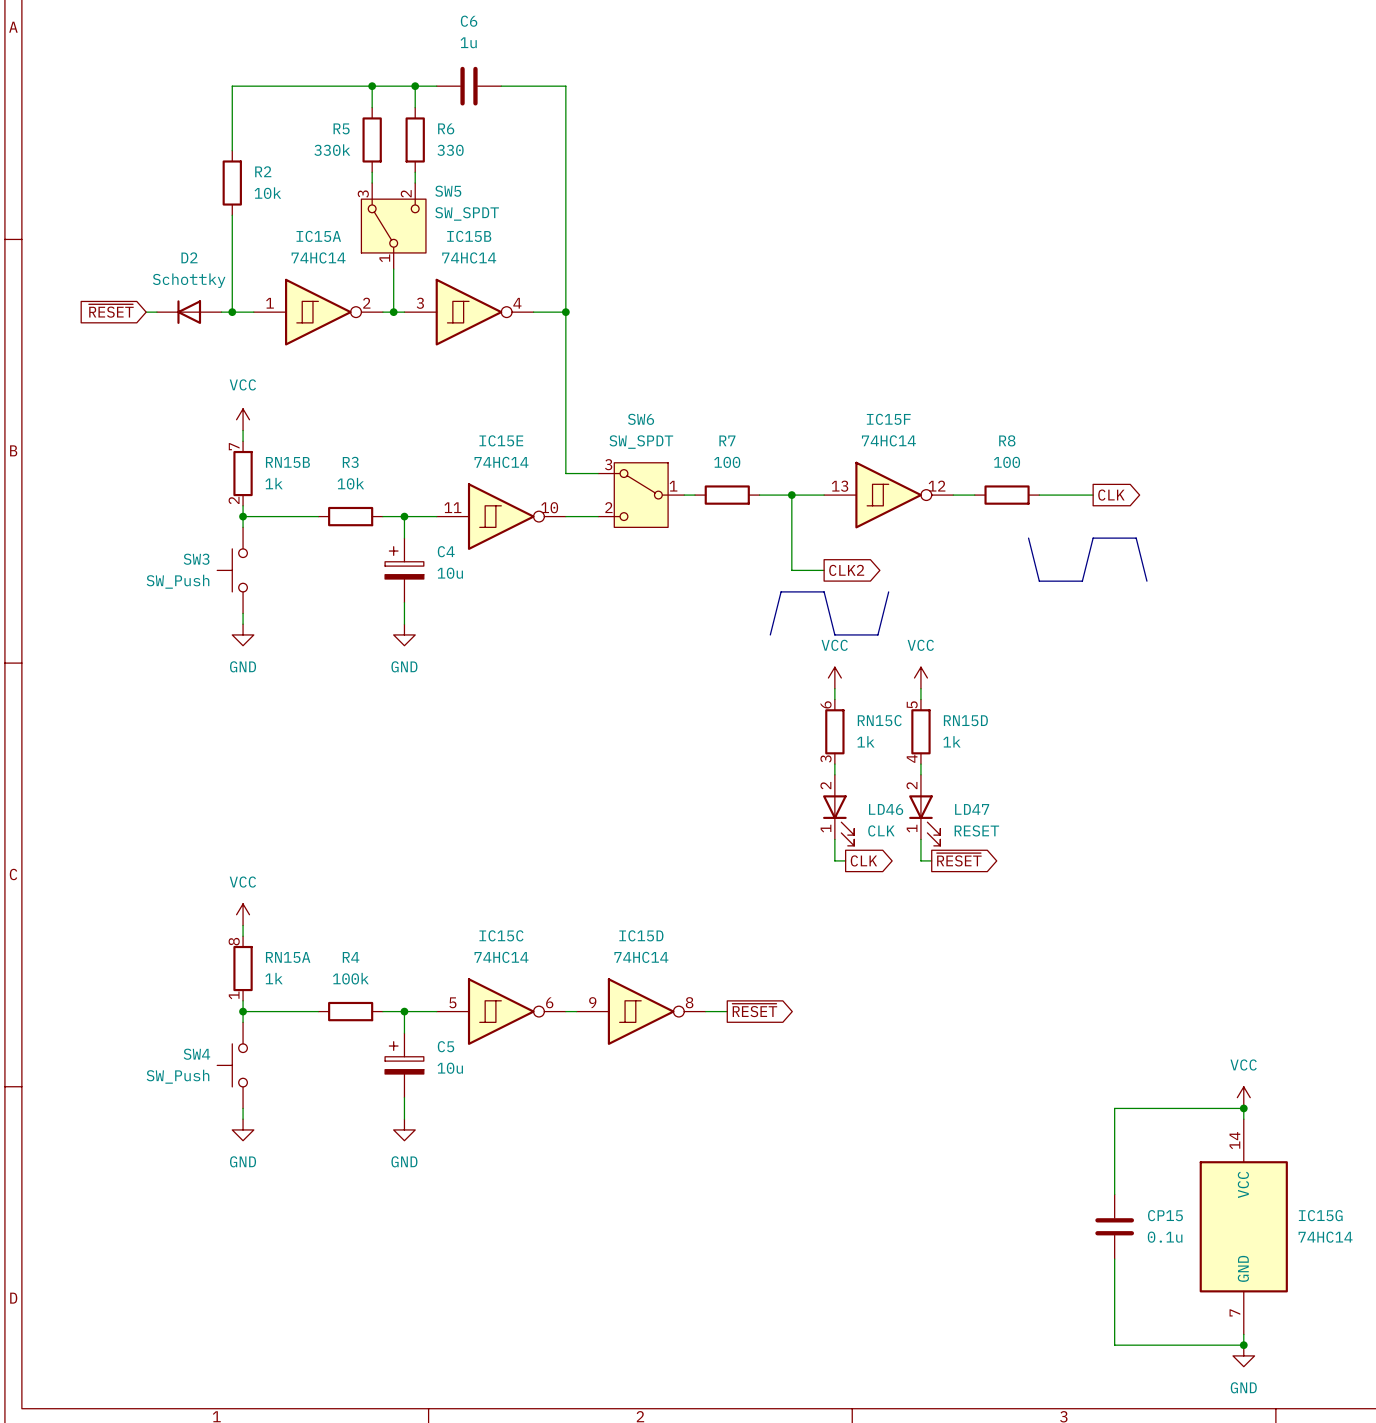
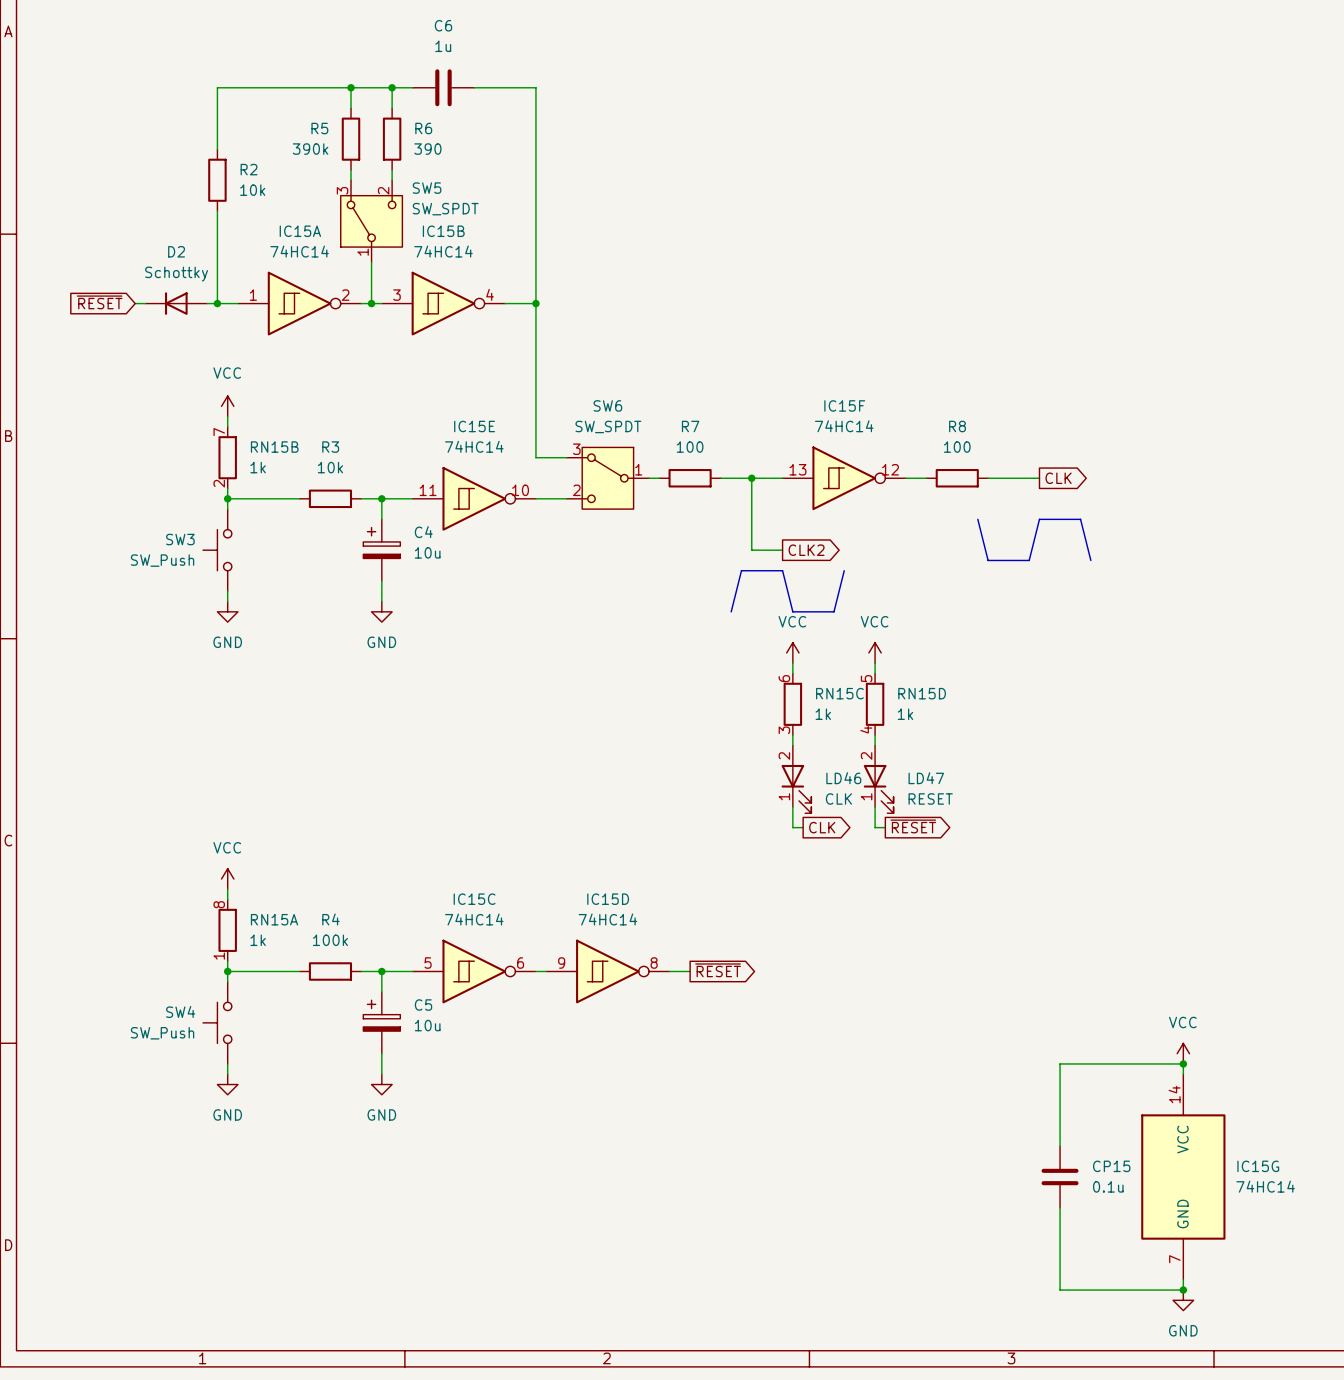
R5 value: 330k (332, 150) -> 390k (310, 149)
R6 value: 330 (450, 150) -> 390 (427, 149)

